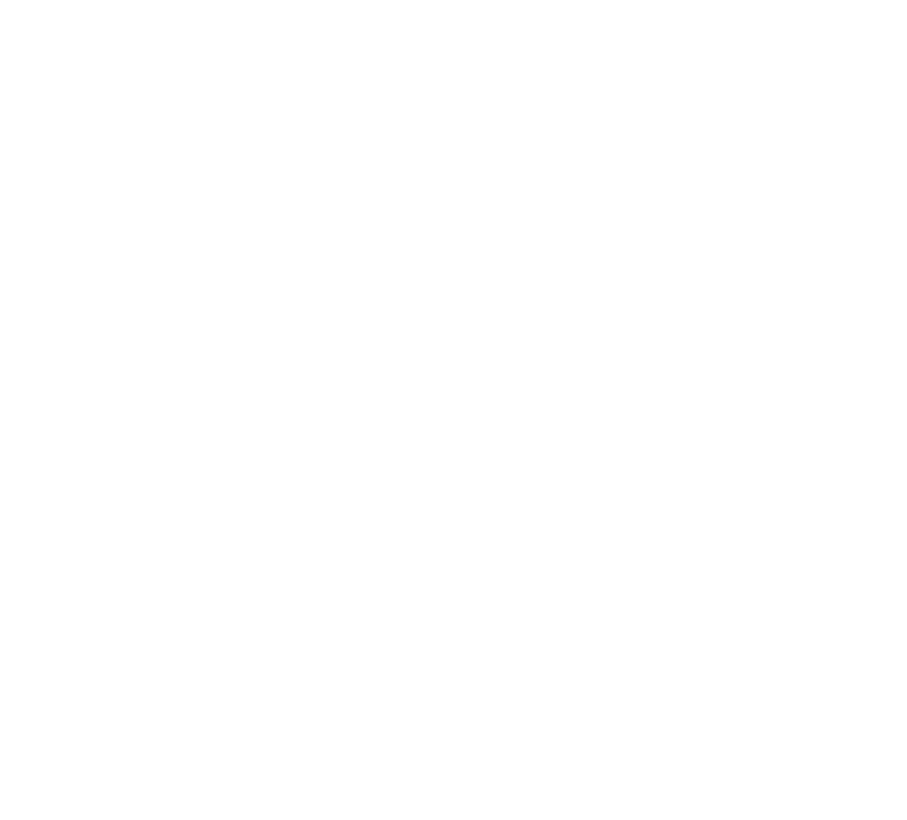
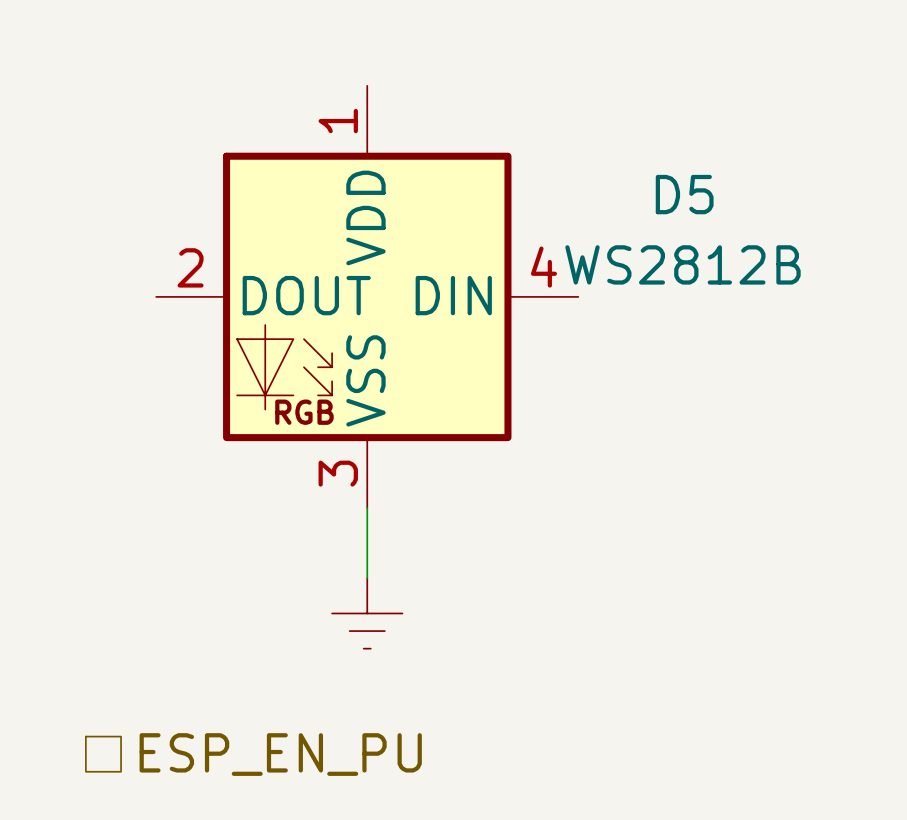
D5: none -> WS2812B (367, 296)
wire: none -> (367, 507) (367, 578)
power symbol: none -> (367, 613)
hierarchical label: none -> ESP_EN_PU (280, 754)

